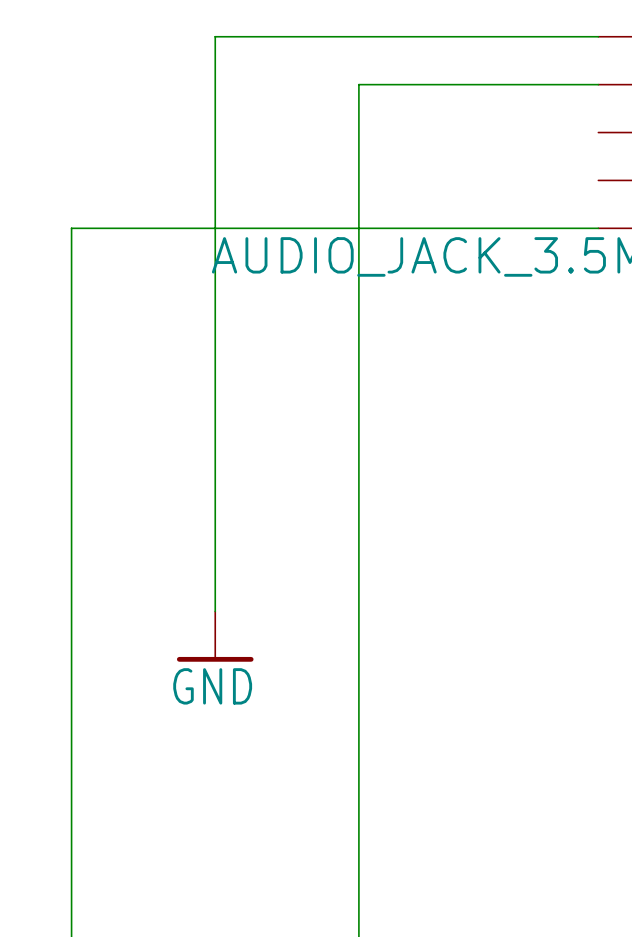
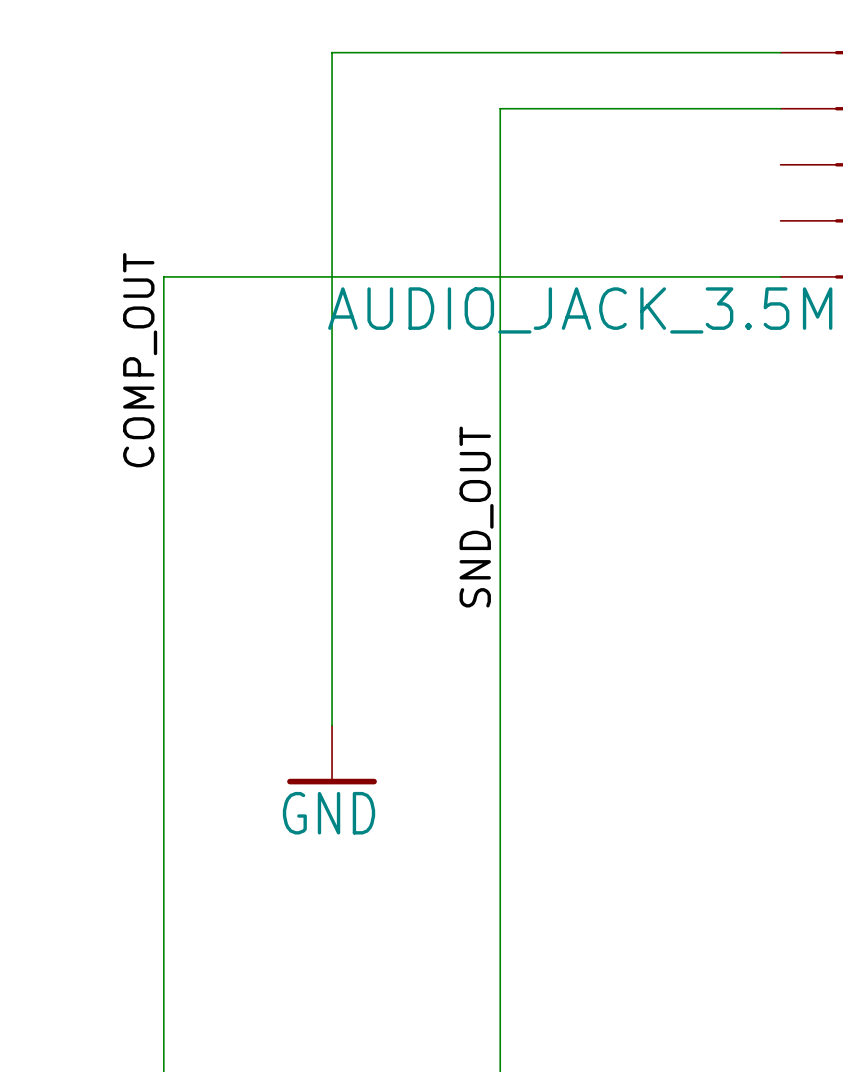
label: none -> COMP_OUT (140, 360)
label: none -> SND_OUT (476, 517)

